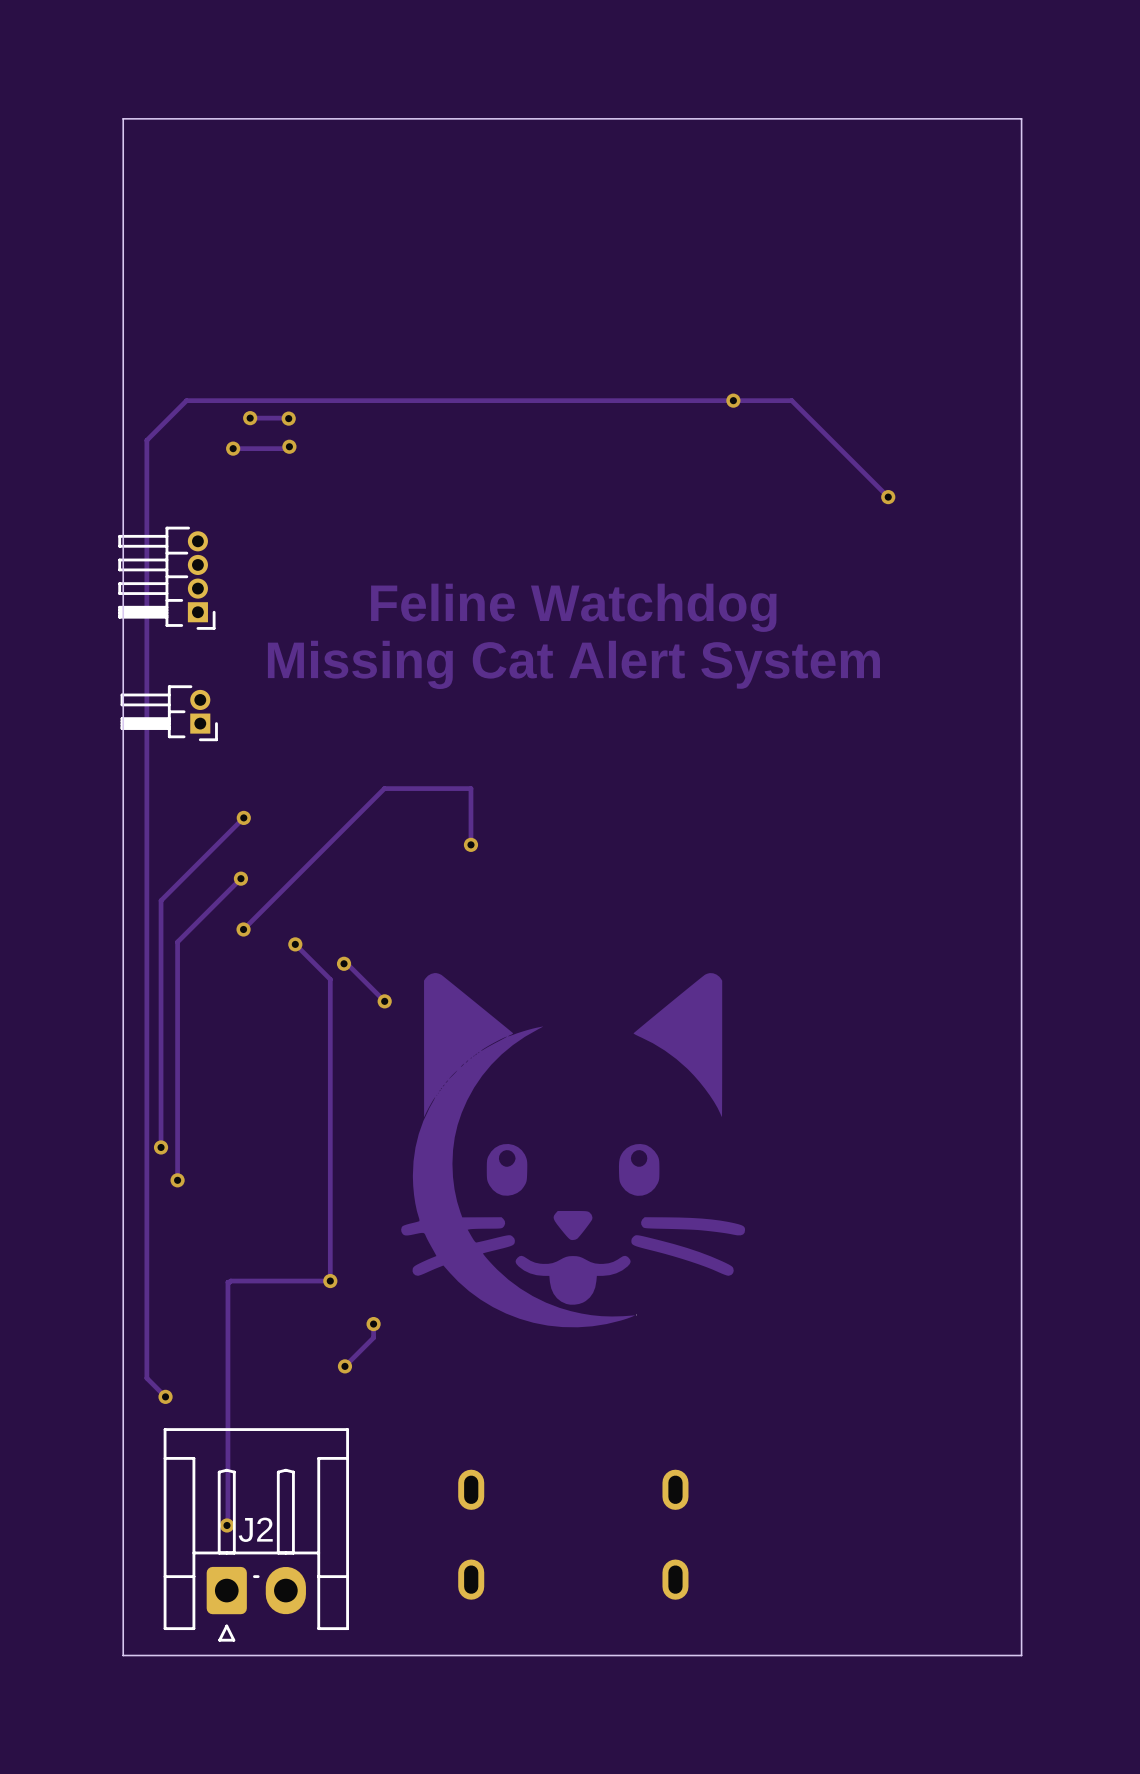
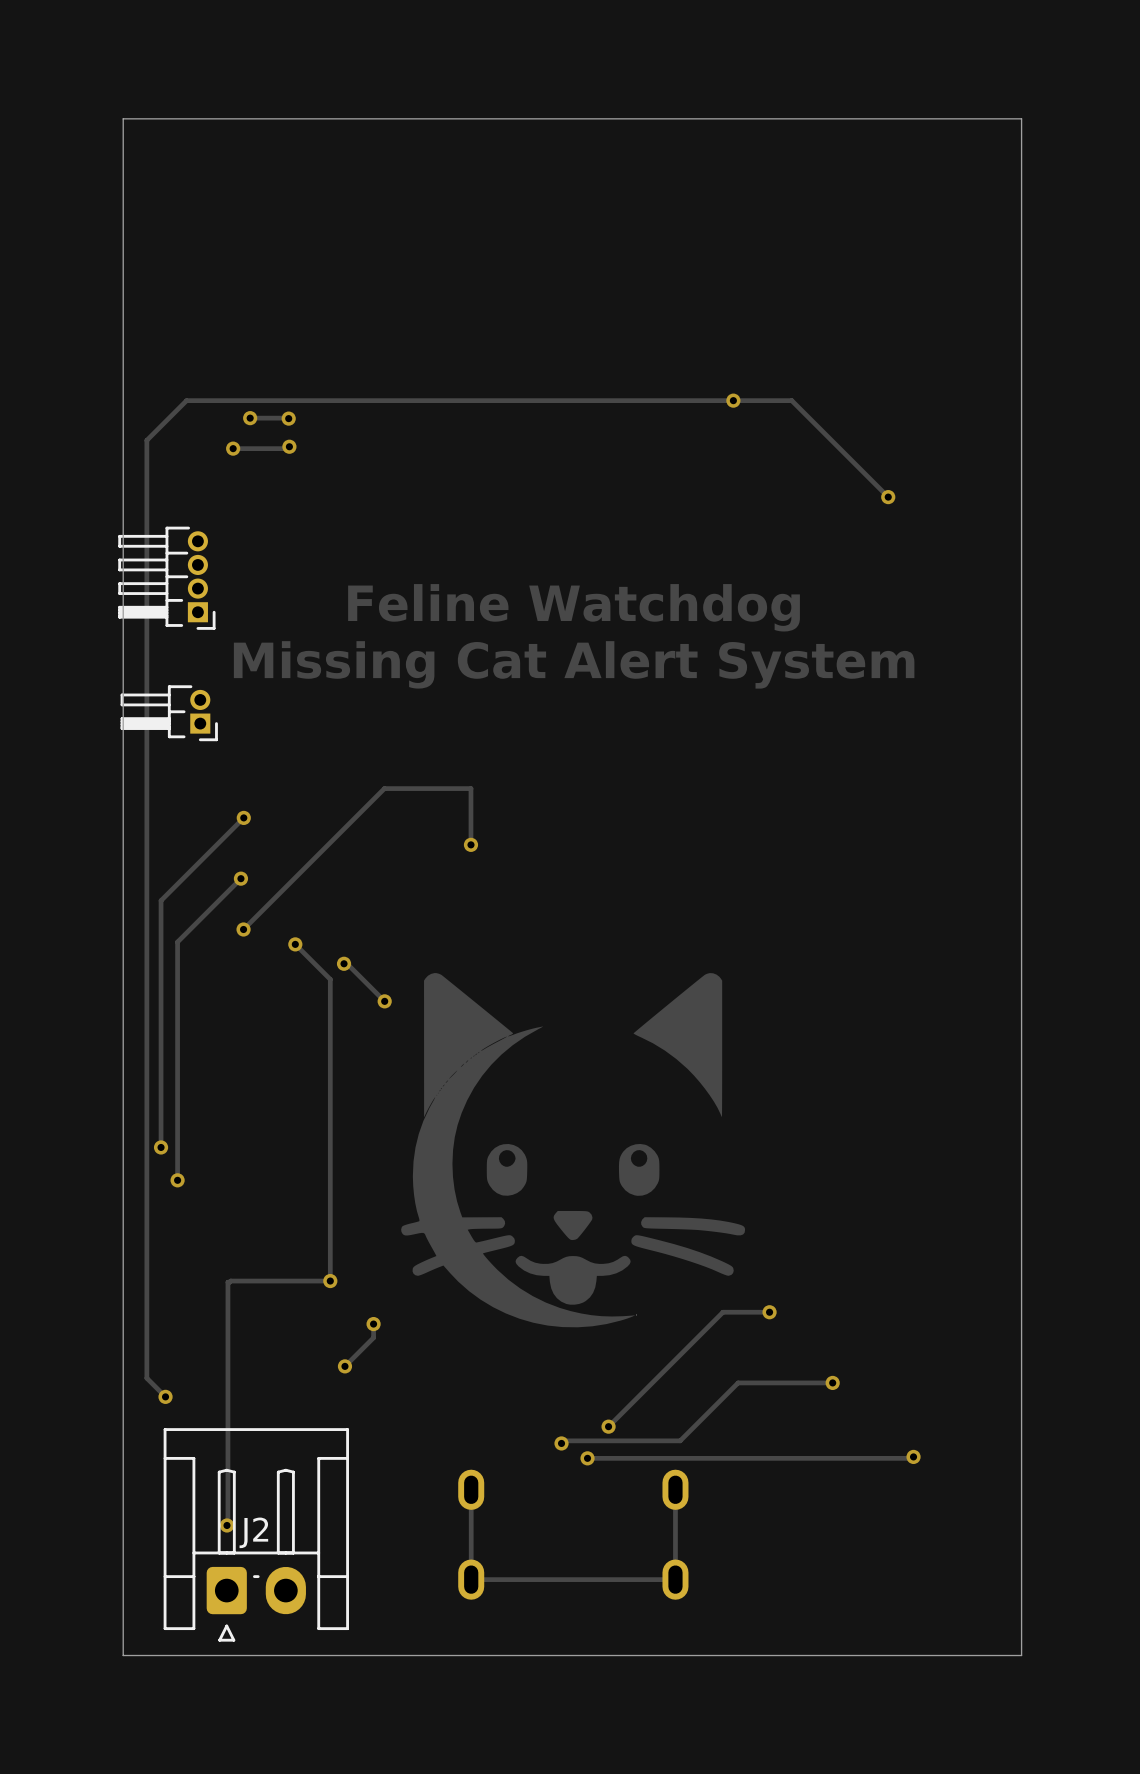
track: none -> (769, 1312) (722, 1312) (608, 1426)
via: none -> (769, 1312)
track: none -> (832, 1382) (738, 1382) (680, 1440) (564, 1440) (561, 1443)
via: none -> (832, 1382)
via: none -> (608, 1426)
via: none -> (561, 1443)
track: none -> (913, 1456) (587, 1458)
via: none -> (913, 1456)
via: none -> (587, 1458)
track: none -> (675, 1489) (675, 1579) (471, 1579) (471, 1489)

